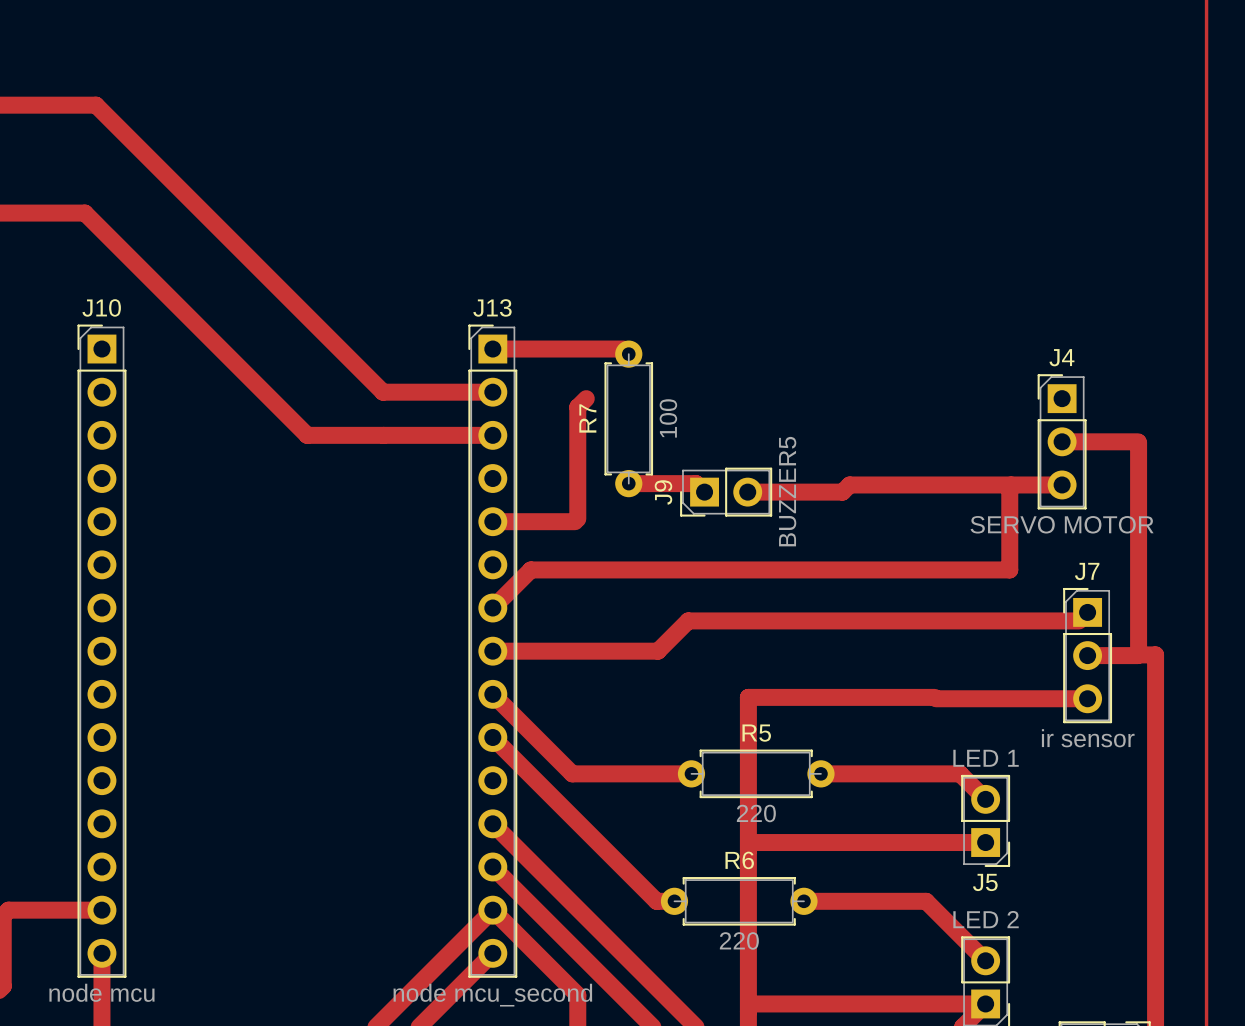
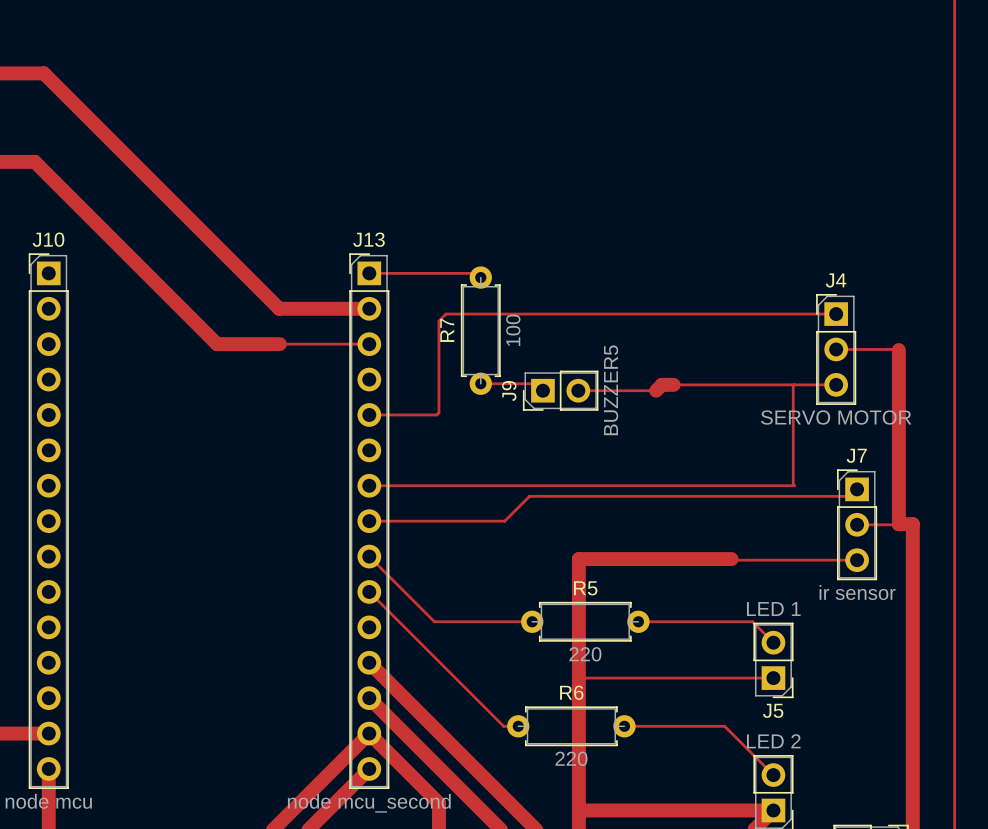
track width: thick (492, 349) (623, 349) -> thin (369, 273) (476, 273)
track: none -> (445, 314) (836, 314)
track width: thick (586, 398) (577, 407) (577, 518) -> thin (445, 314) (438, 321) (438, 412)
track width: thick (383, 435) (492, 435) -> thin (279, 344) (369, 344)
track width: thick (1062, 441) (1137, 441) -> thin (836, 349) (898, 349)
track width: thick (628, 483) (696, 483) (704, 492) -> thin (480, 383) (535, 383) (542, 390)
track width: thick (863, 484) (1062, 484) -> thin (673, 384) (836, 384)
track width: thick (1009, 486) (1009, 569) -> thin (793, 385) (793, 454)
track width: thick (747, 492) (842, 492) -> thin (578, 390) (656, 390)
track width: thick (492, 521) (575, 521) -> thin (369, 414) (436, 414)
track: (1009, 569) (530, 569) (492, 608) -> (793, 454) (794, 485) (369, 485)
track width: thick (1079, 620) (688, 620) (658, 651) (492, 651) -> thin (850, 496) (529, 496) (504, 521) (369, 521)
track width: thick (1087, 655) (1137, 655) -> thin (857, 524) (898, 524)
track width: thick (492, 694) (572, 773) (691, 773) -> thin (369, 556) (434, 621) (532, 621)
track width: thick (936, 698) (1087, 698) -> thin (732, 560) (857, 560)
track width: thick (492, 737) (656, 901) (674, 901) -> thin (369, 591) (503, 726) (518, 726)
track width: thick (820, 773) (960, 773) (985, 799) -> thin (638, 621) (752, 621) (773, 642)
track width: thick (756, 842) (985, 842) -> thin (585, 678) (773, 678)
track width: thick (803, 901) (926, 901) (985, 960) -> thin (624, 726) (724, 726) (773, 775)

